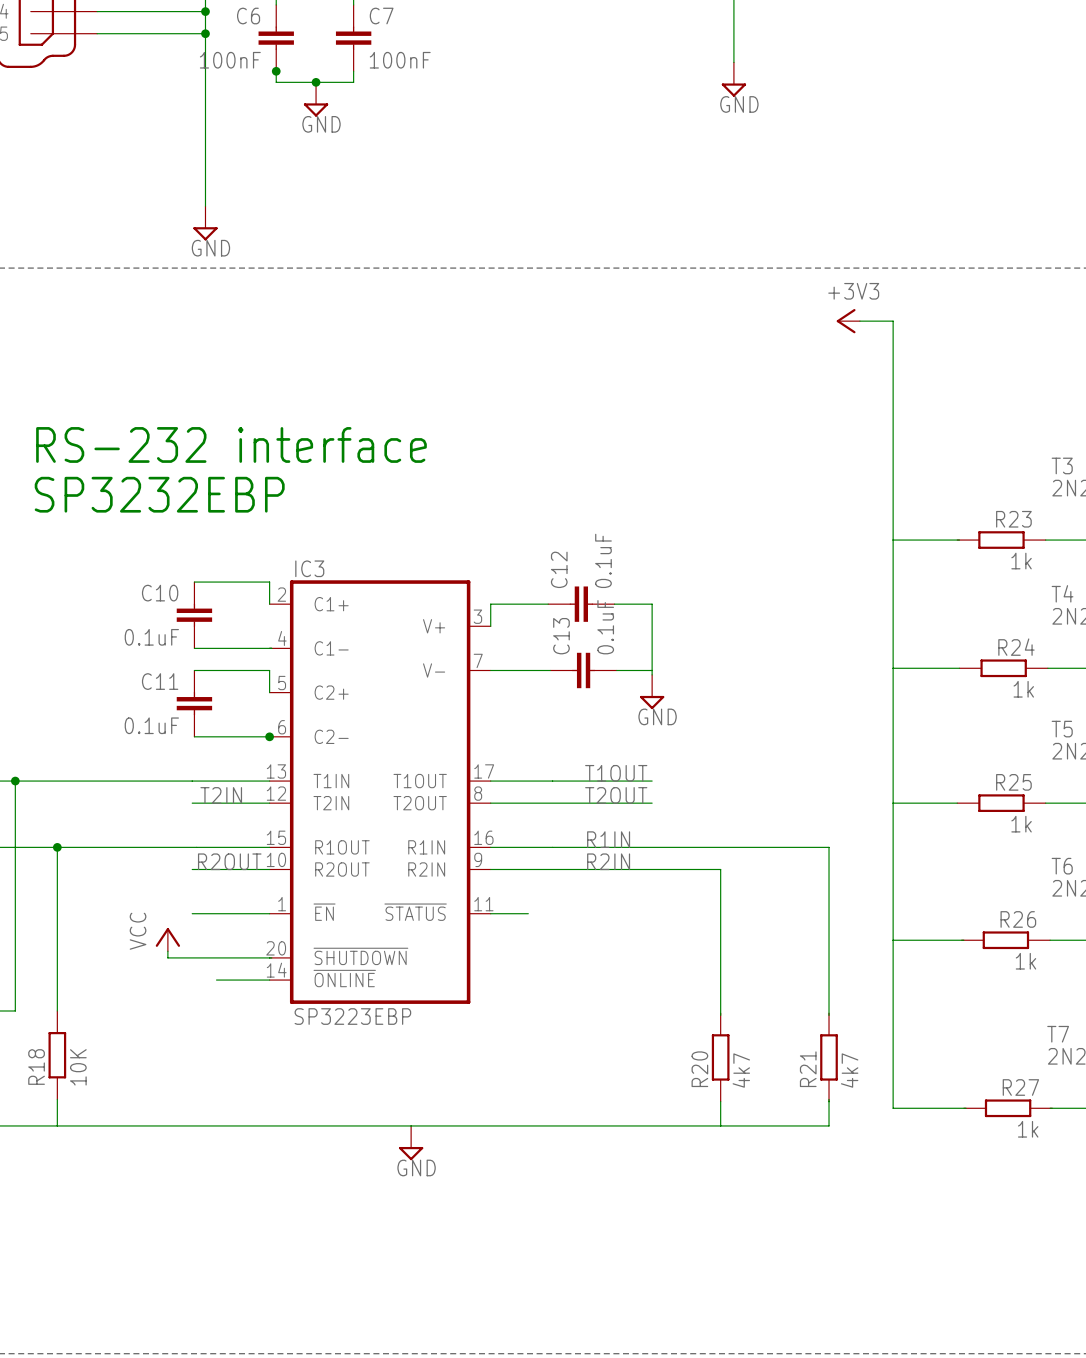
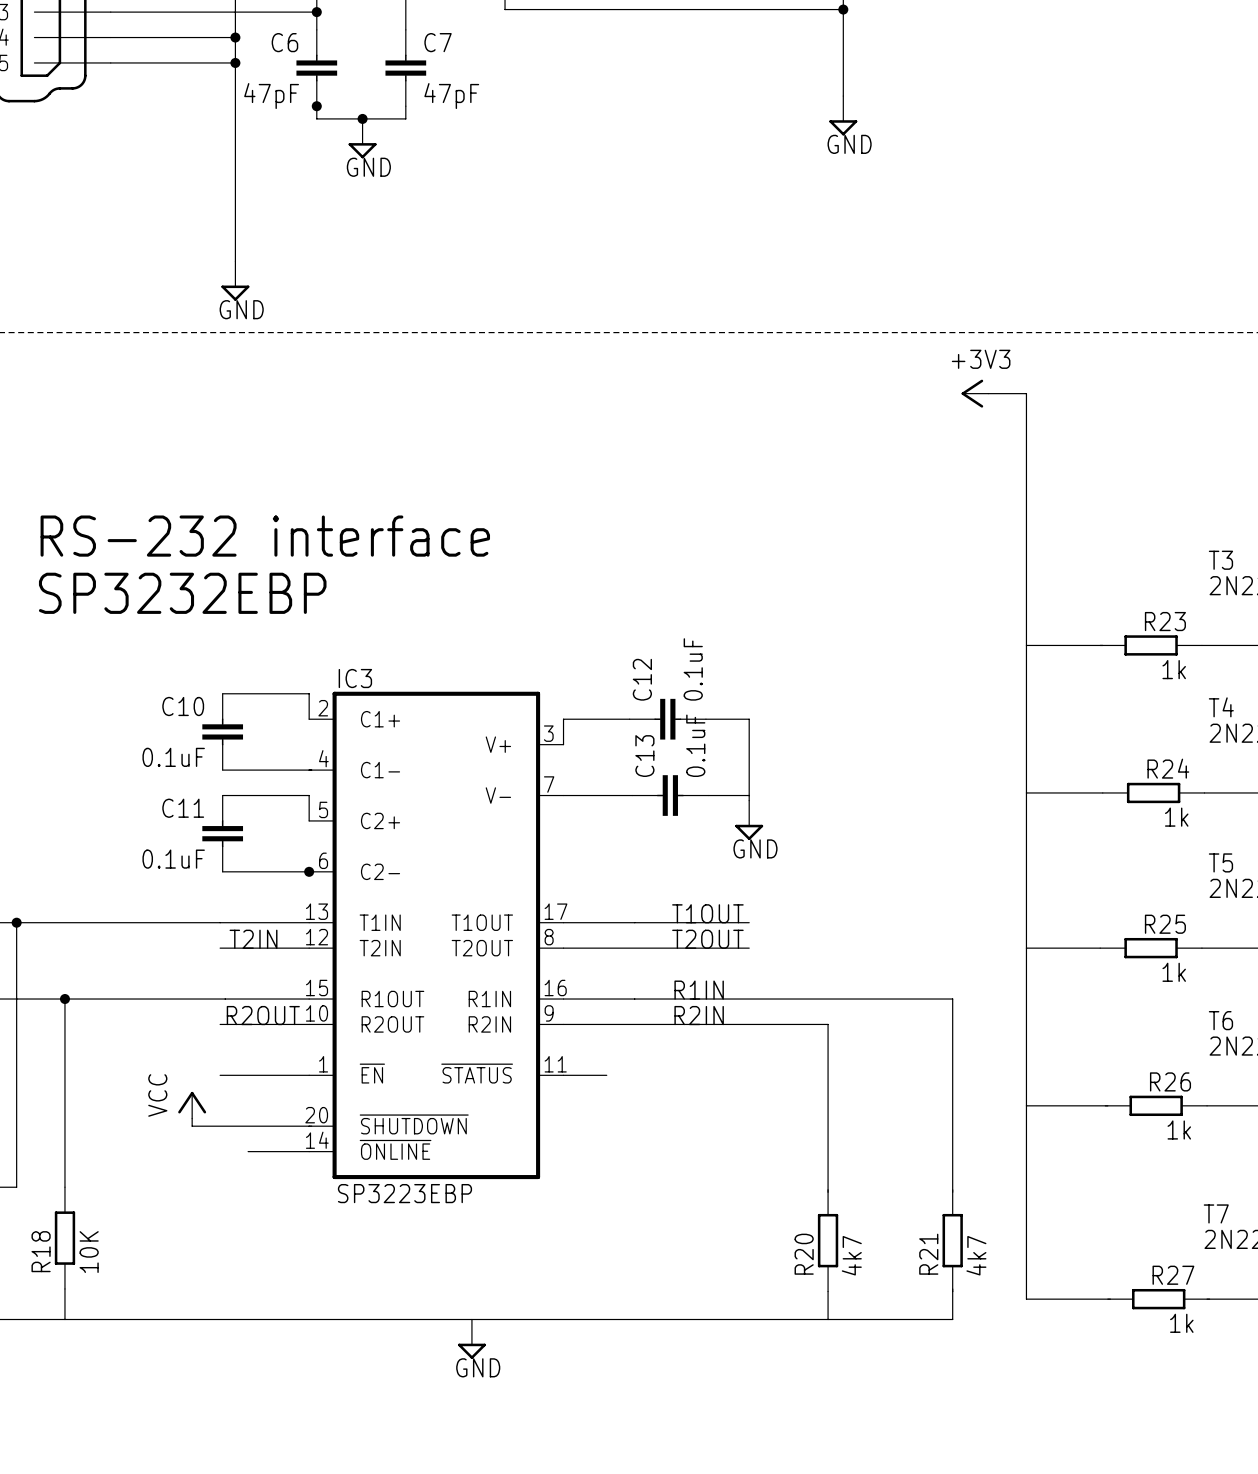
C6 value: 100nF (230, 60) -> 47pF (271, 96)
C7 value: 100nF (400, 60) -> 47pF (451, 96)

